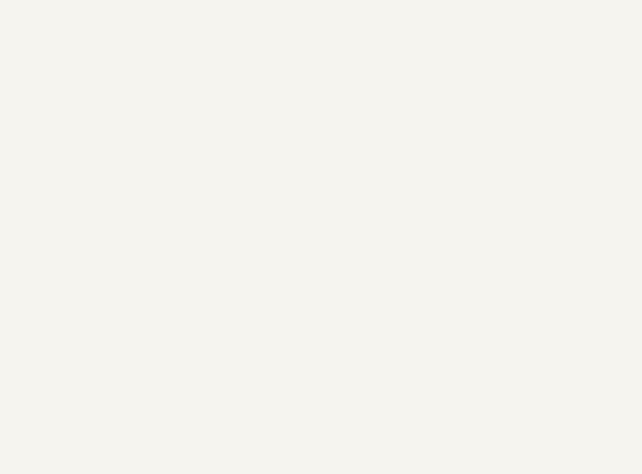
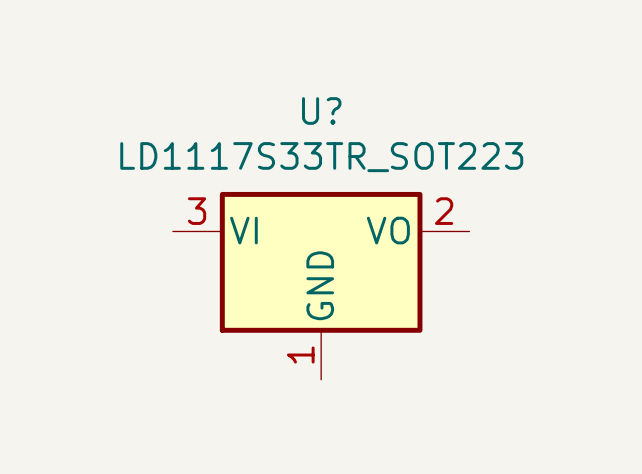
U?: none -> LD1117S33TR_SOT223 (321, 285)

